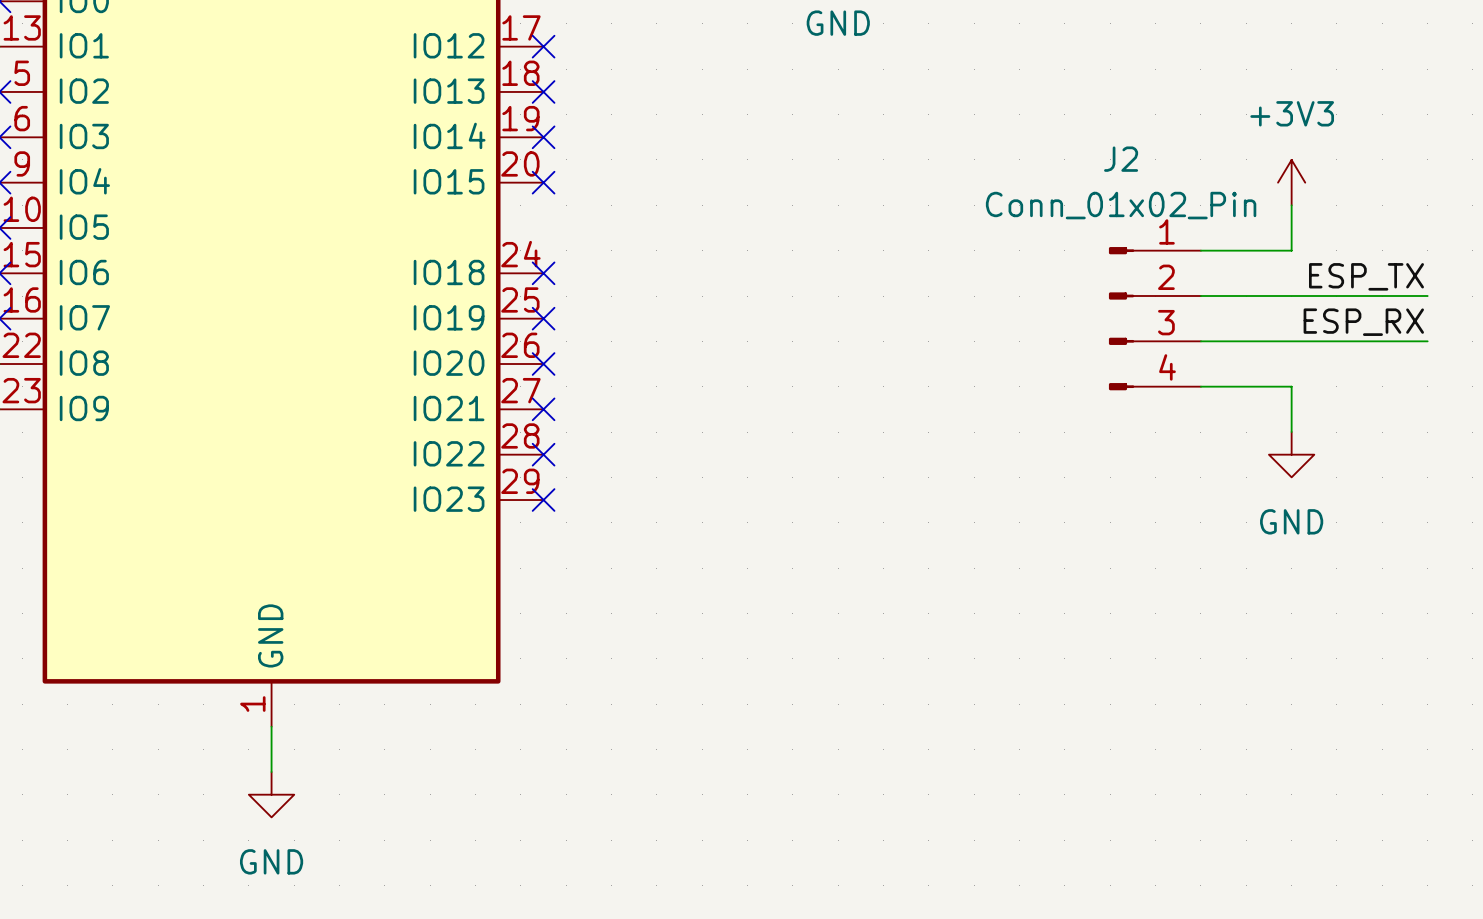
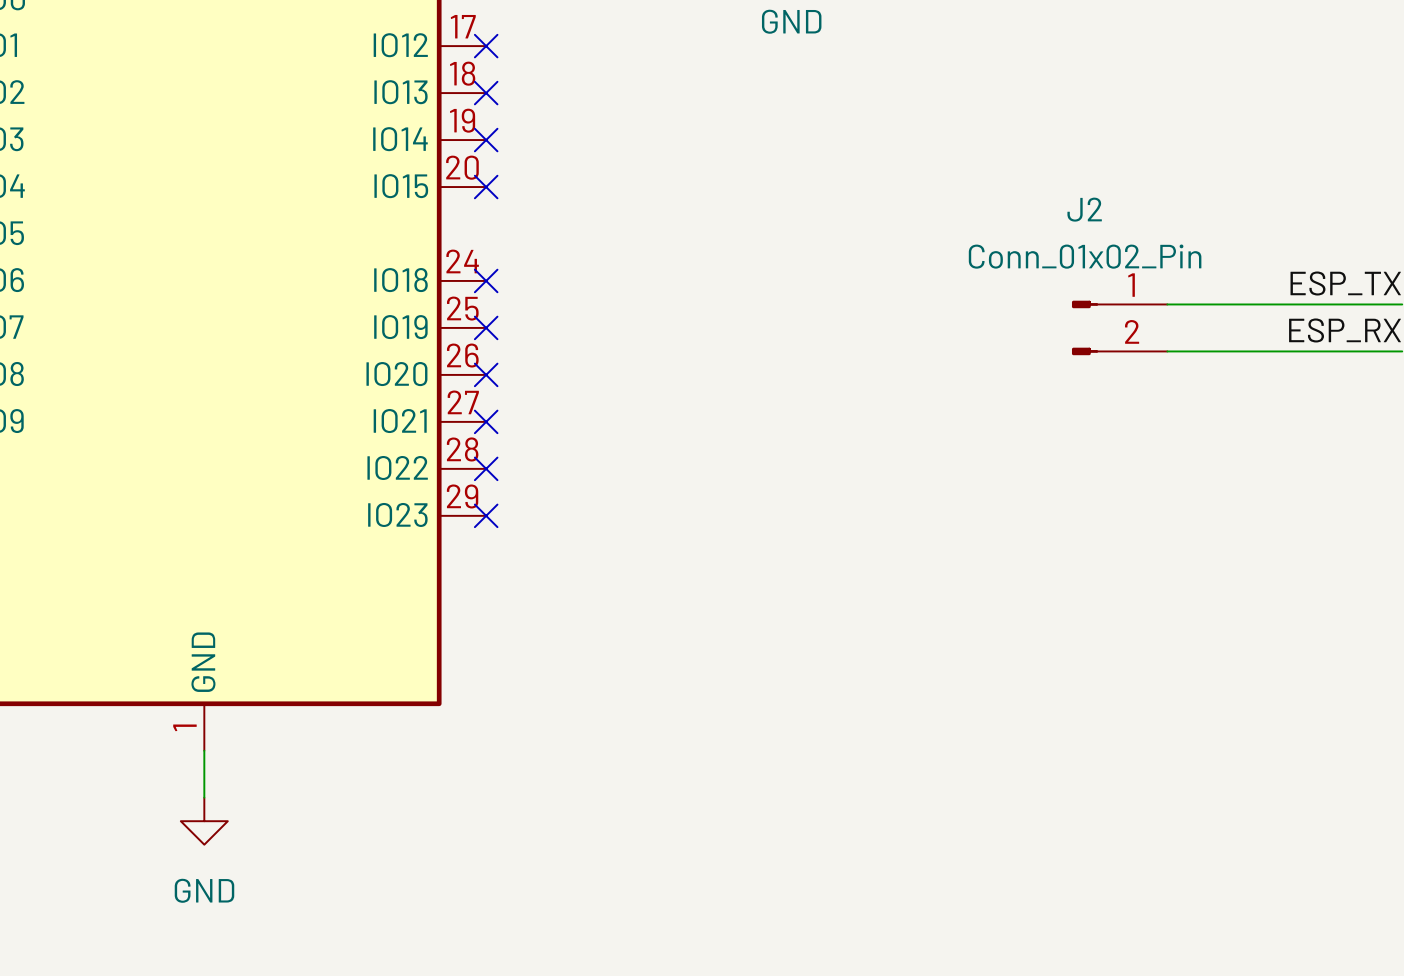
J2 name position: J2 (1121, 159) -> J2 (1084, 209)
power symbol: +3V3 (1291, 182) -> none
J2 value position: Conn_01x02_Pin (1121, 205) -> Conn_01x02_Pin (1085, 256)
wire: (1291, 205) (1291, 250) (1200, 250) -> none
J2 symbol: [1108, 247, 1201, 391] -> [1071, 300, 1168, 356]
wire: (1200, 386) (1291, 386) (1291, 432) -> none
power symbol: GND (1291, 454) -> none

